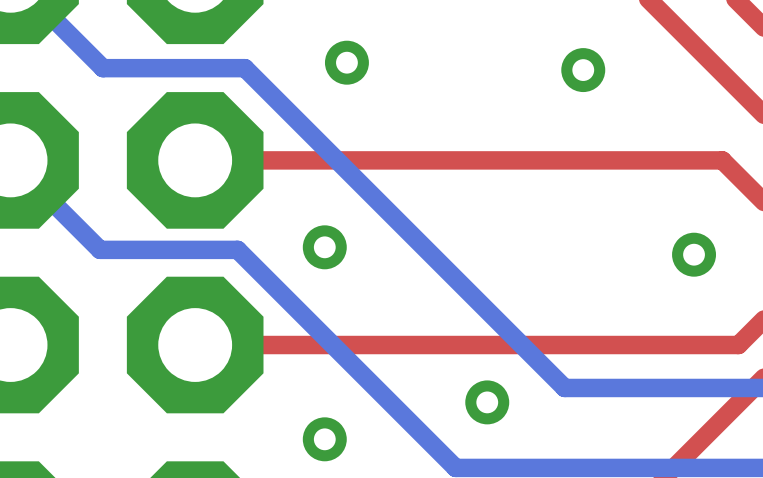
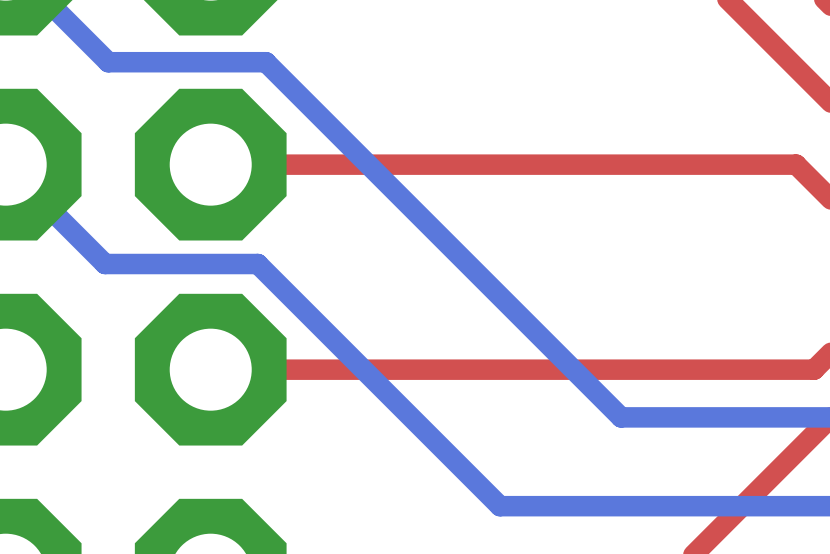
via: (346, 62) -> none
via: (583, 70) -> none
via: (324, 247) -> none
via: (694, 254) -> none
via: (487, 402) -> none
via: (324, 439) -> none

